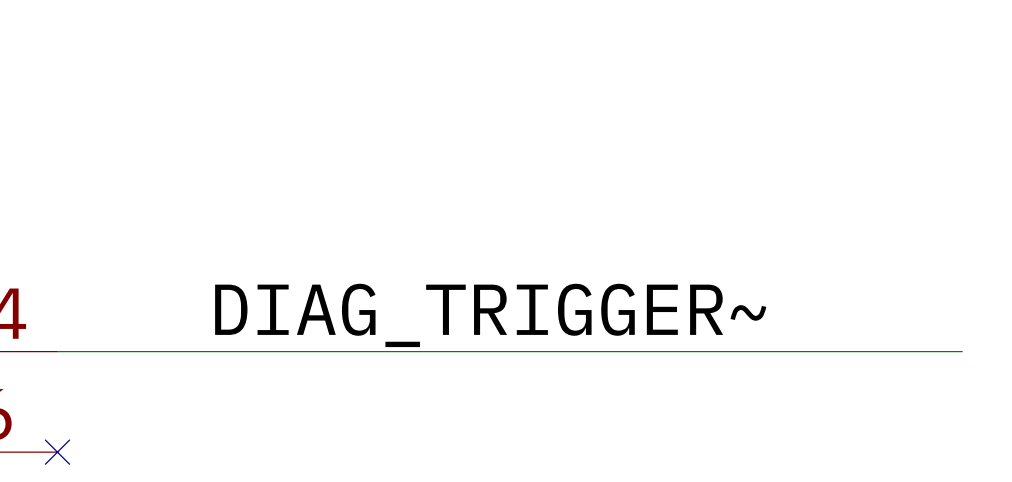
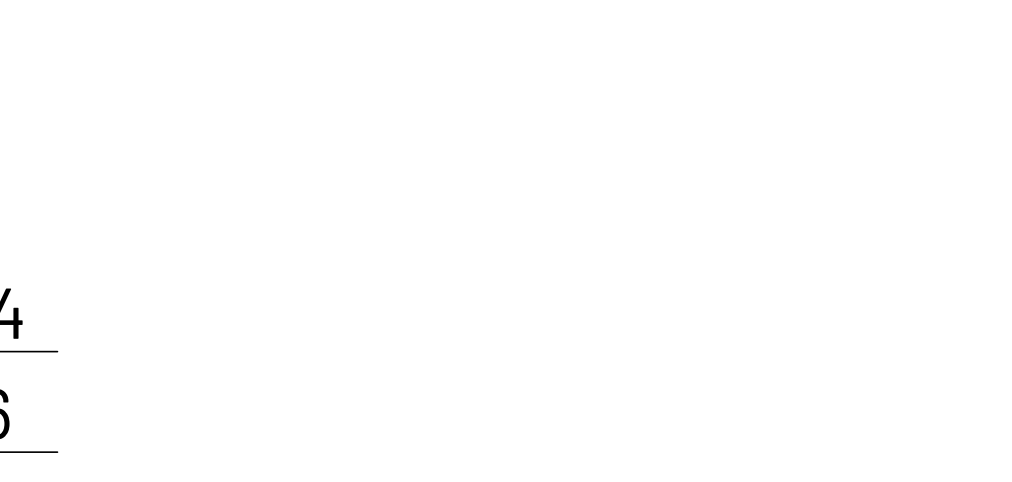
label: DIAG_TRIGGER~ (490, 315) -> none
wire: (57, 351) (962, 351) -> none
no-connect mark: (57, 452) -> none

